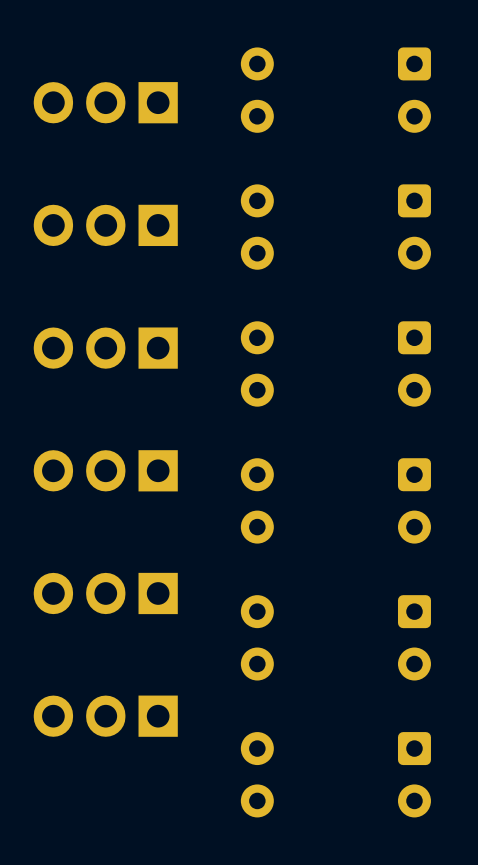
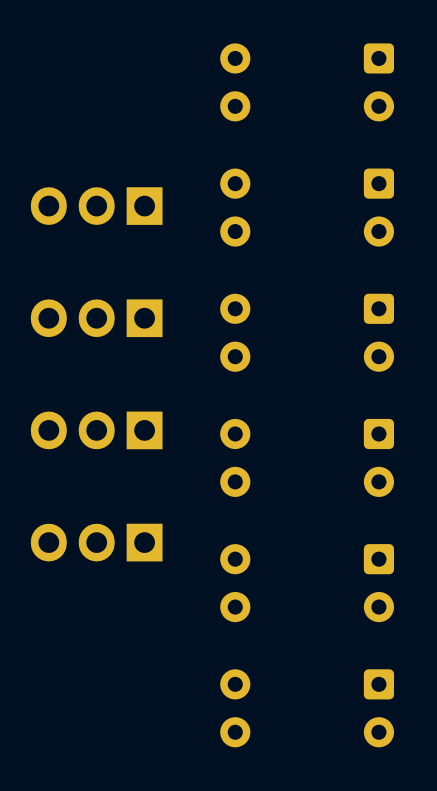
part: (105, 102) -> none
part: (105, 716) -> none

